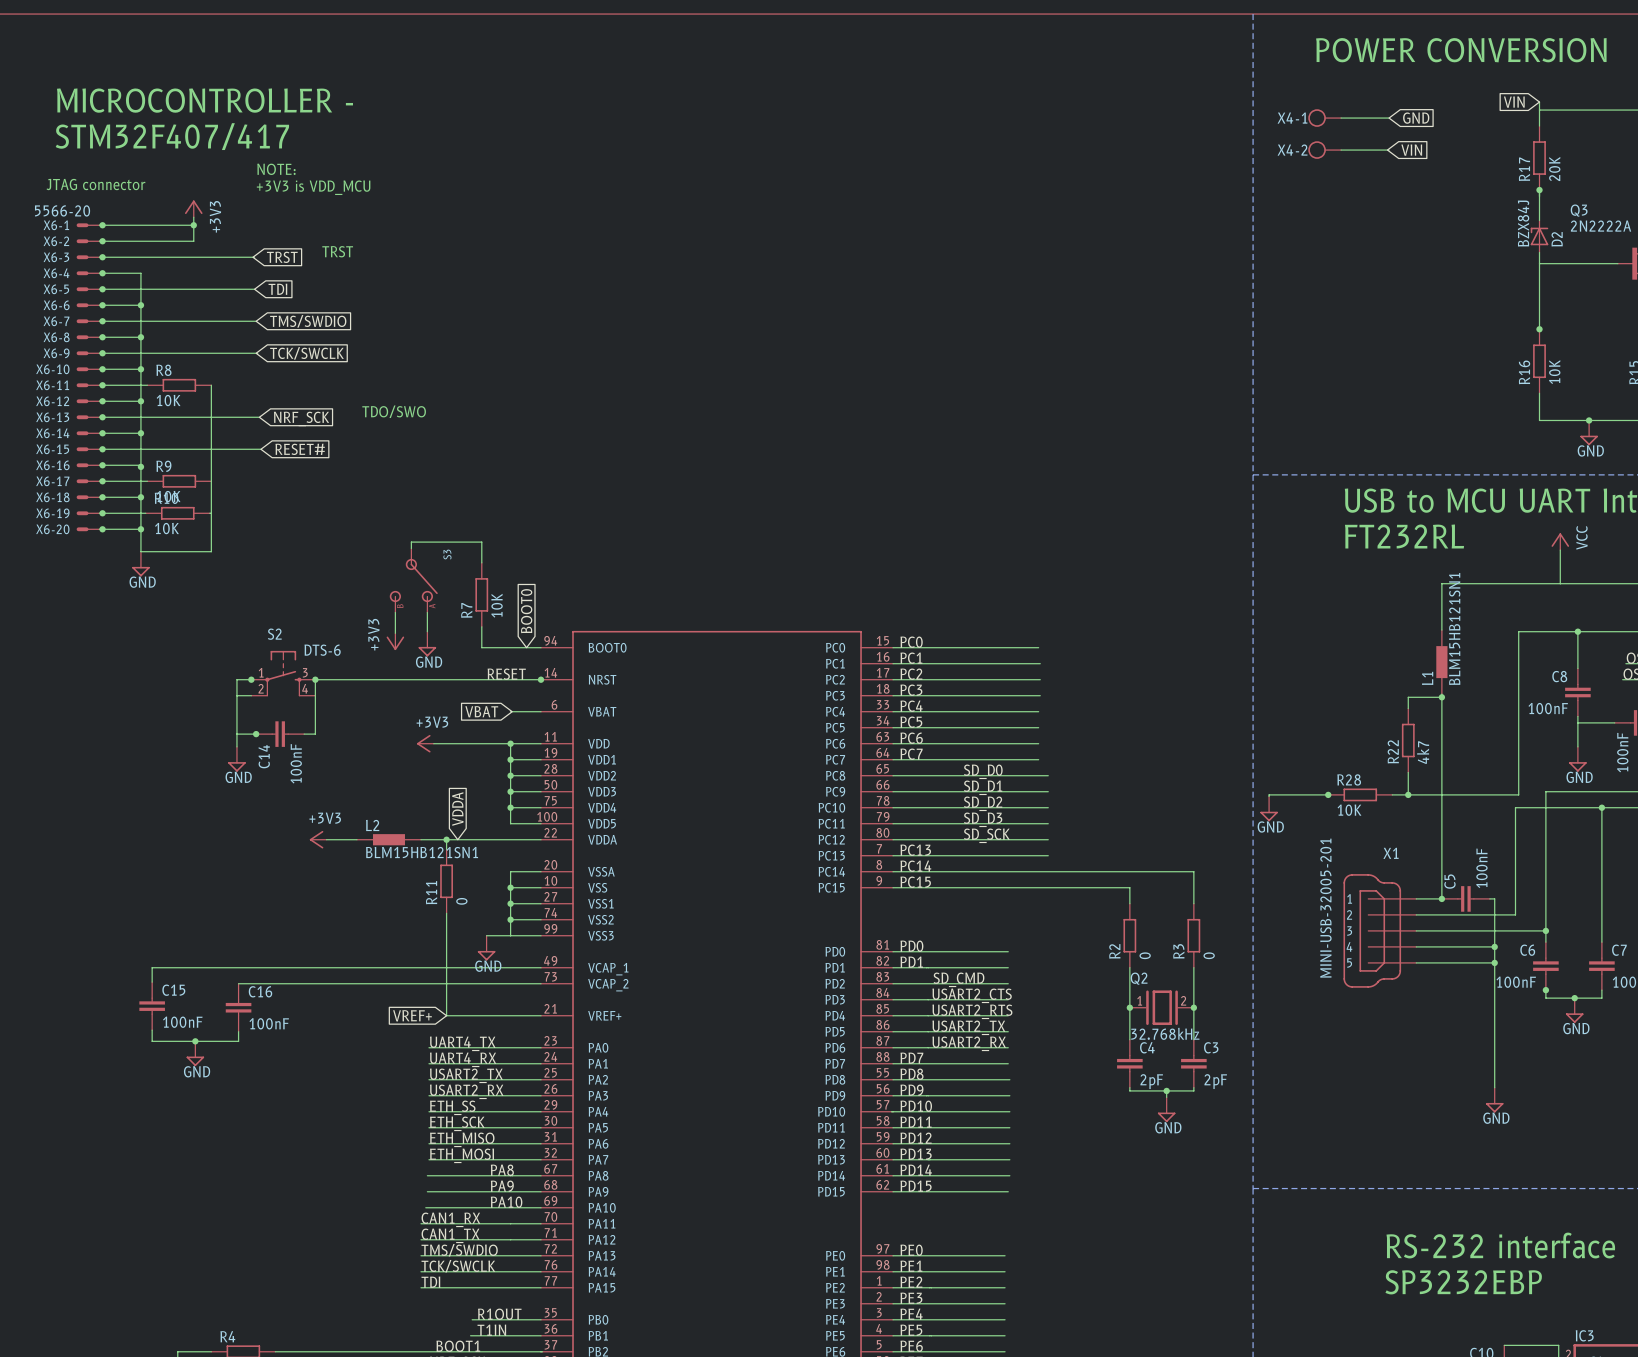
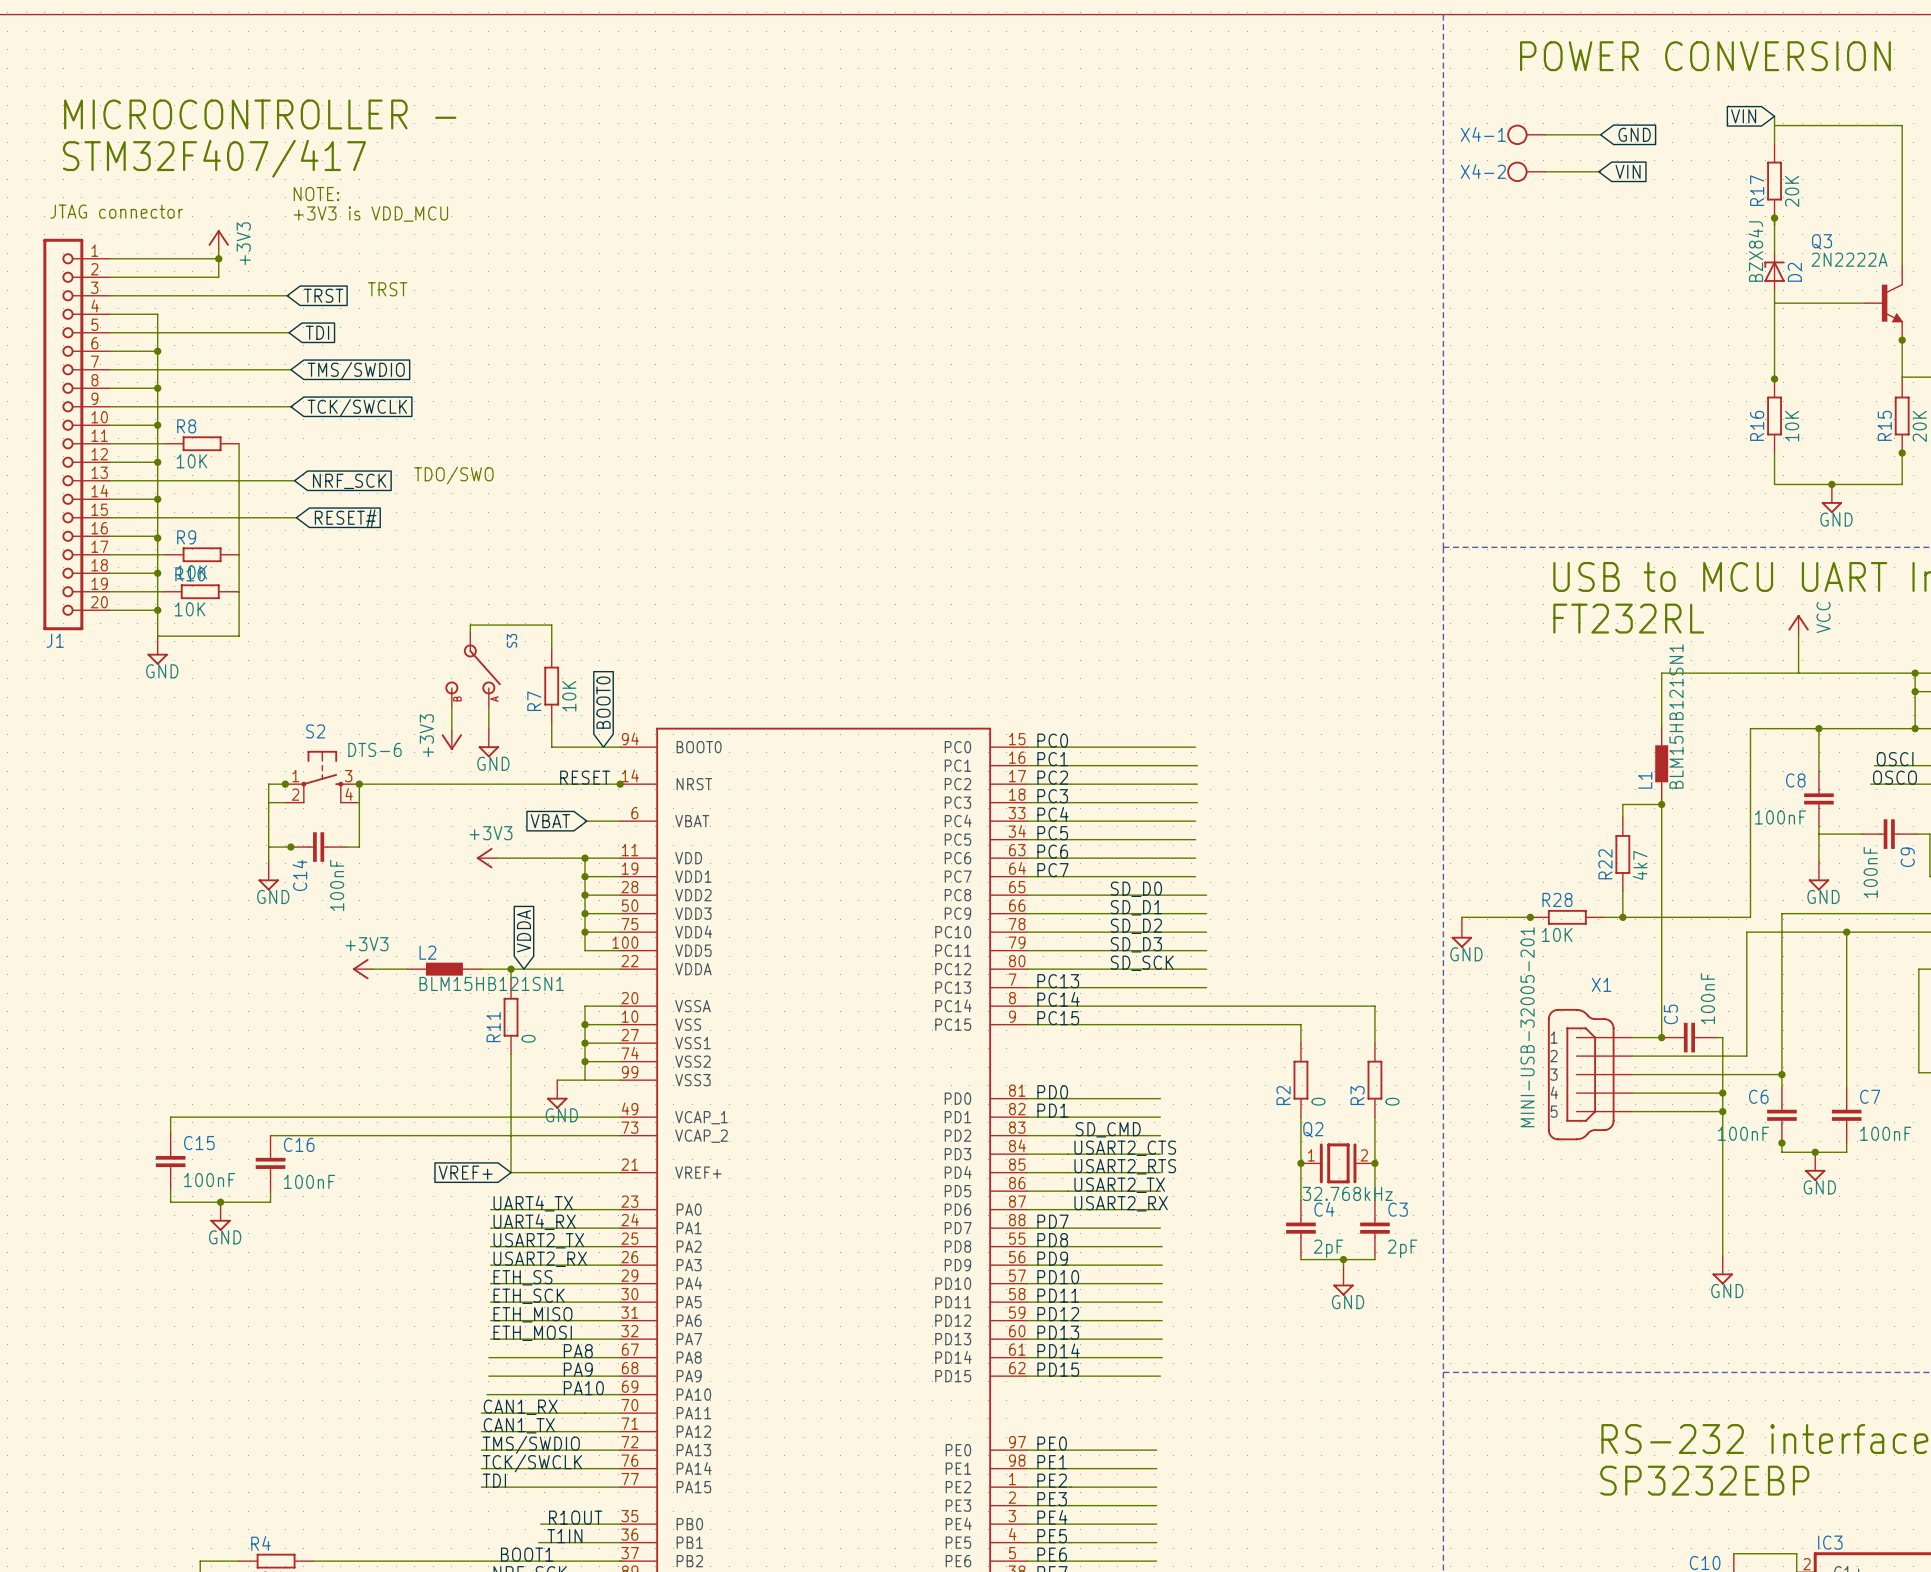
X6-1: 5566-20 (89, 225) -> none
junction: (102, 225) -> none
X6-2: (89, 241) -> none
junction: (102, 241) -> none
X6-3: (89, 257) -> none
junction: (102, 257) -> none
X6-4: (89, 273) -> none
junction: (102, 273) -> none
X6-5: (89, 289) -> none
junction: (102, 289) -> none
X6-6: (89, 305) -> none
junction: (102, 305) -> none
X6-7: (89, 321) -> none
junction: (102, 321) -> none
X6-8: (89, 337) -> none
junction: (102, 337) -> none
X6-9: (89, 353) -> none
junction: (102, 353) -> none
X6-10: (89, 369) -> none
junction: (102, 369) -> none
J1: none -> (76, 434)
X6-11: (89, 385) -> none
junction: (102, 385) -> none
X6-12: (89, 401) -> none
junction: (102, 401) -> none
X6-13: (89, 417) -> none
junction: (102, 417) -> none
X6-14: (89, 433) -> none
junction: (102, 433) -> none
X6-15: (89, 449) -> none
junction: (102, 449) -> none
X6-16: (89, 465) -> none
junction: (102, 465) -> none
X6-17: (89, 481) -> none
junction: (102, 481) -> none
X6-18: (89, 497) -> none
junction: (102, 497) -> none
X6-19: (89, 513) -> none
junction: (102, 513) -> none
X6-20: (89, 529) -> none
junction: (102, 529) -> none

